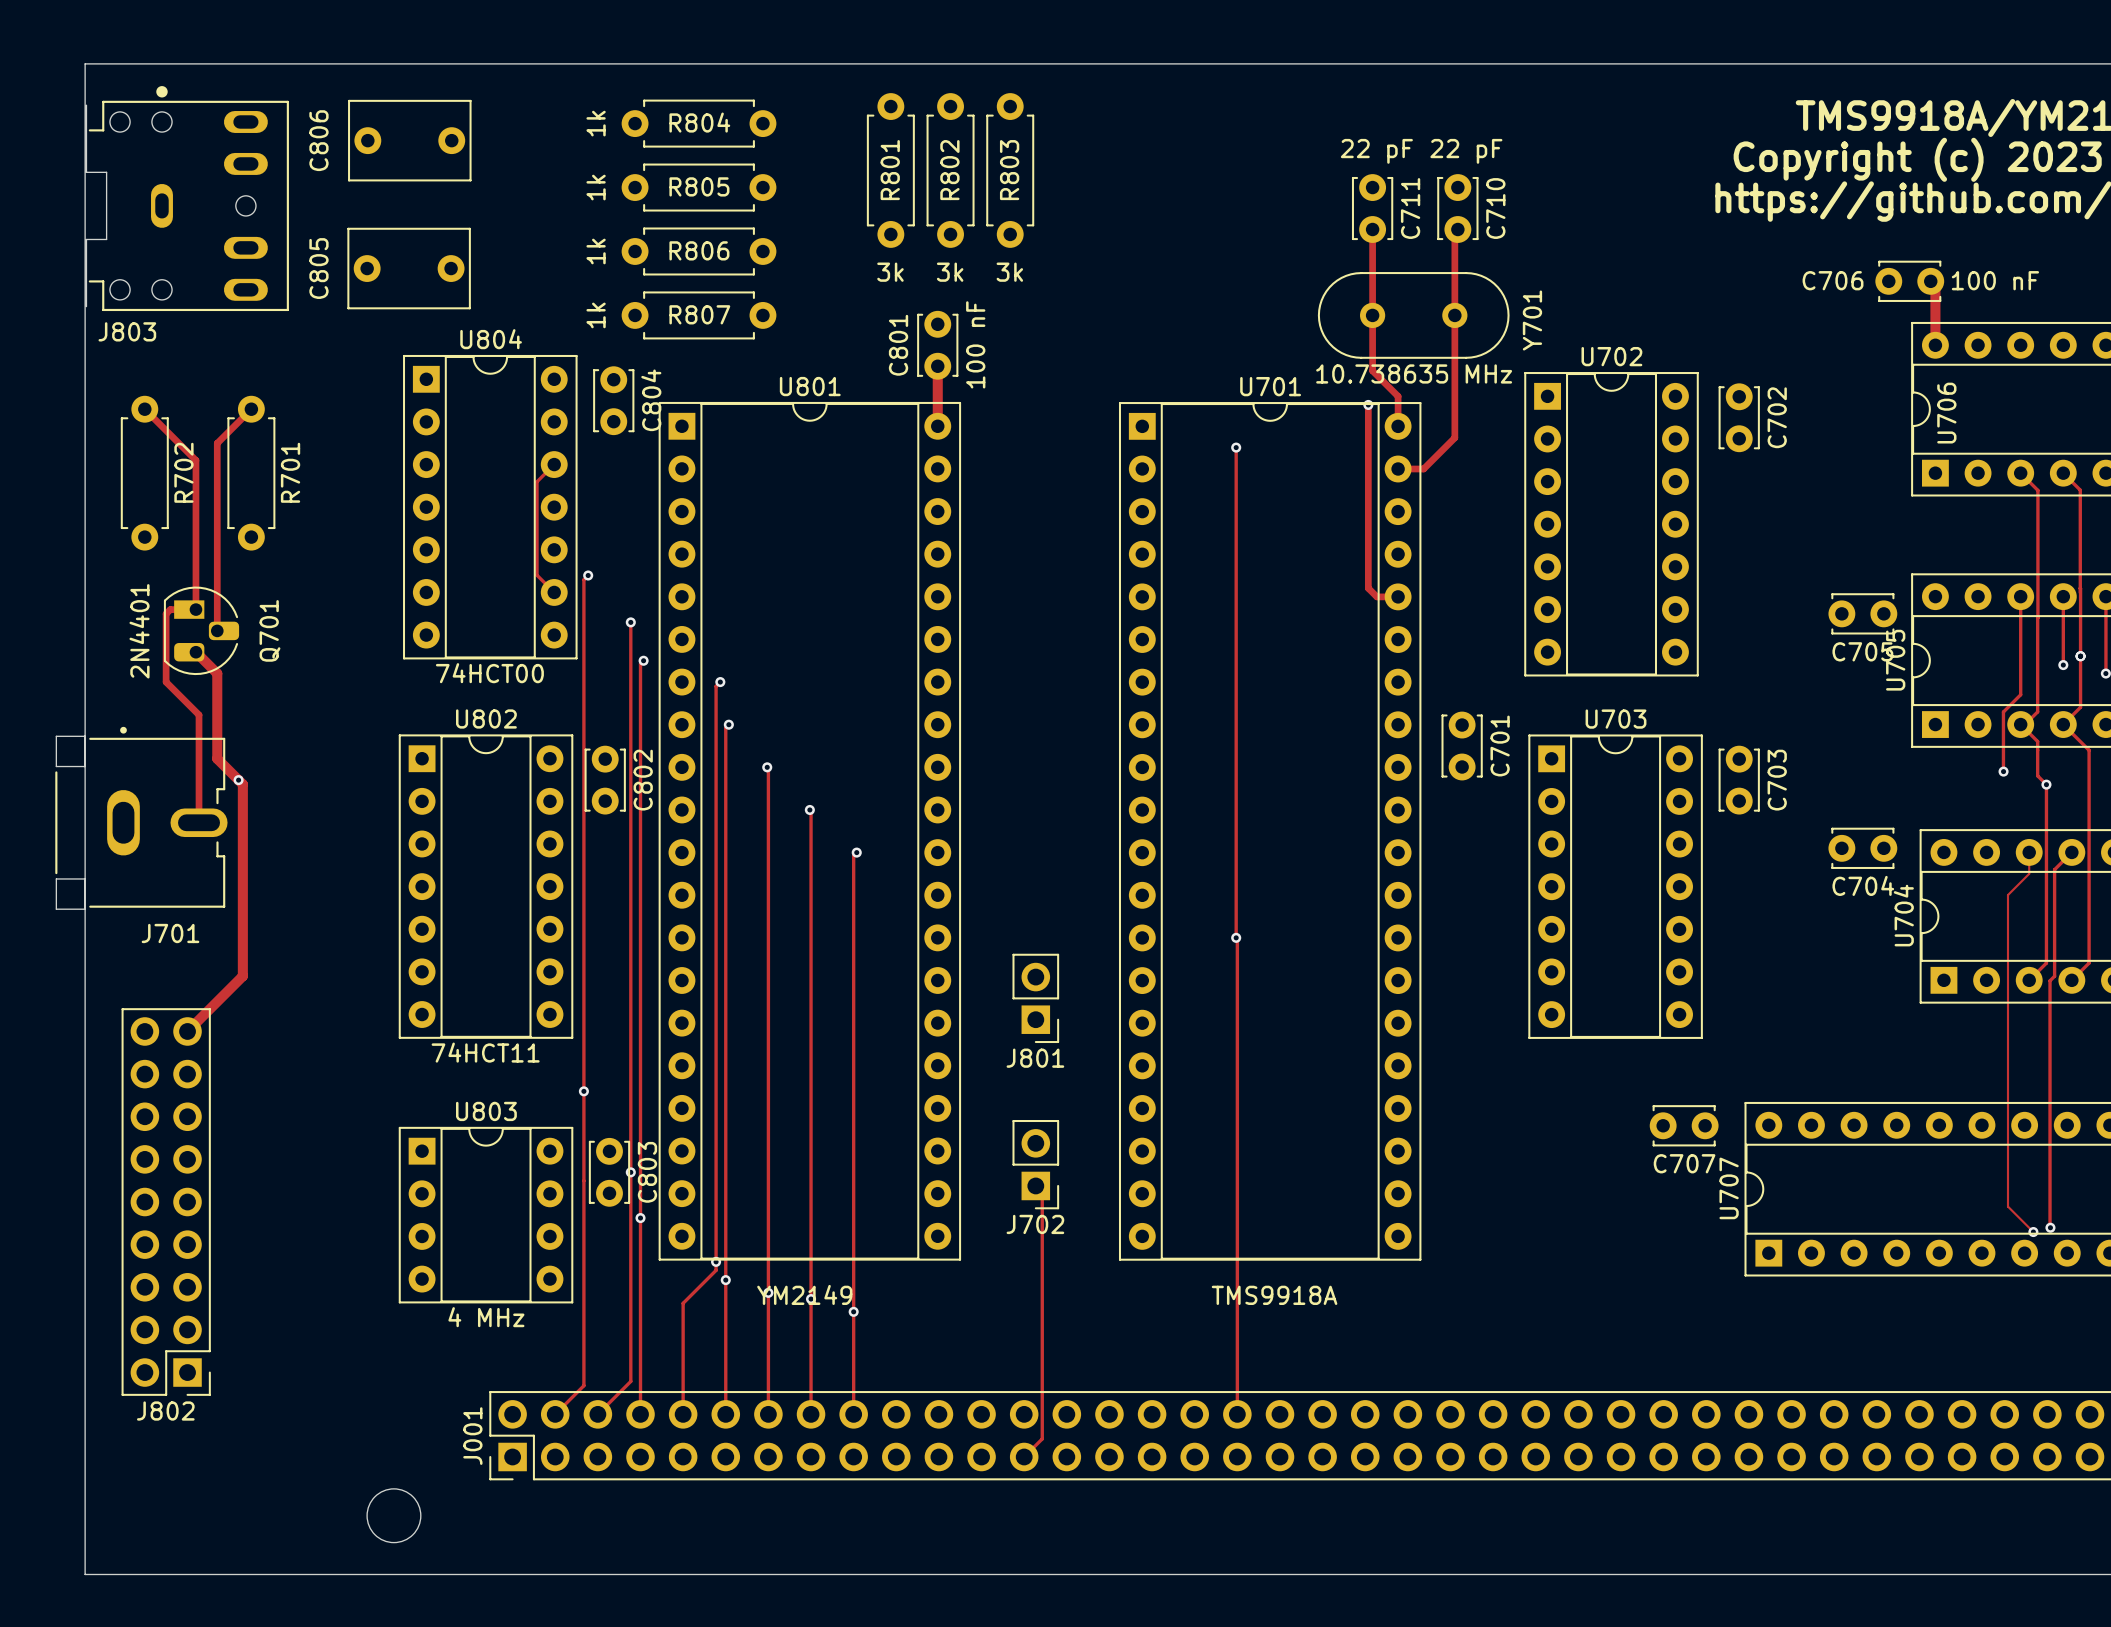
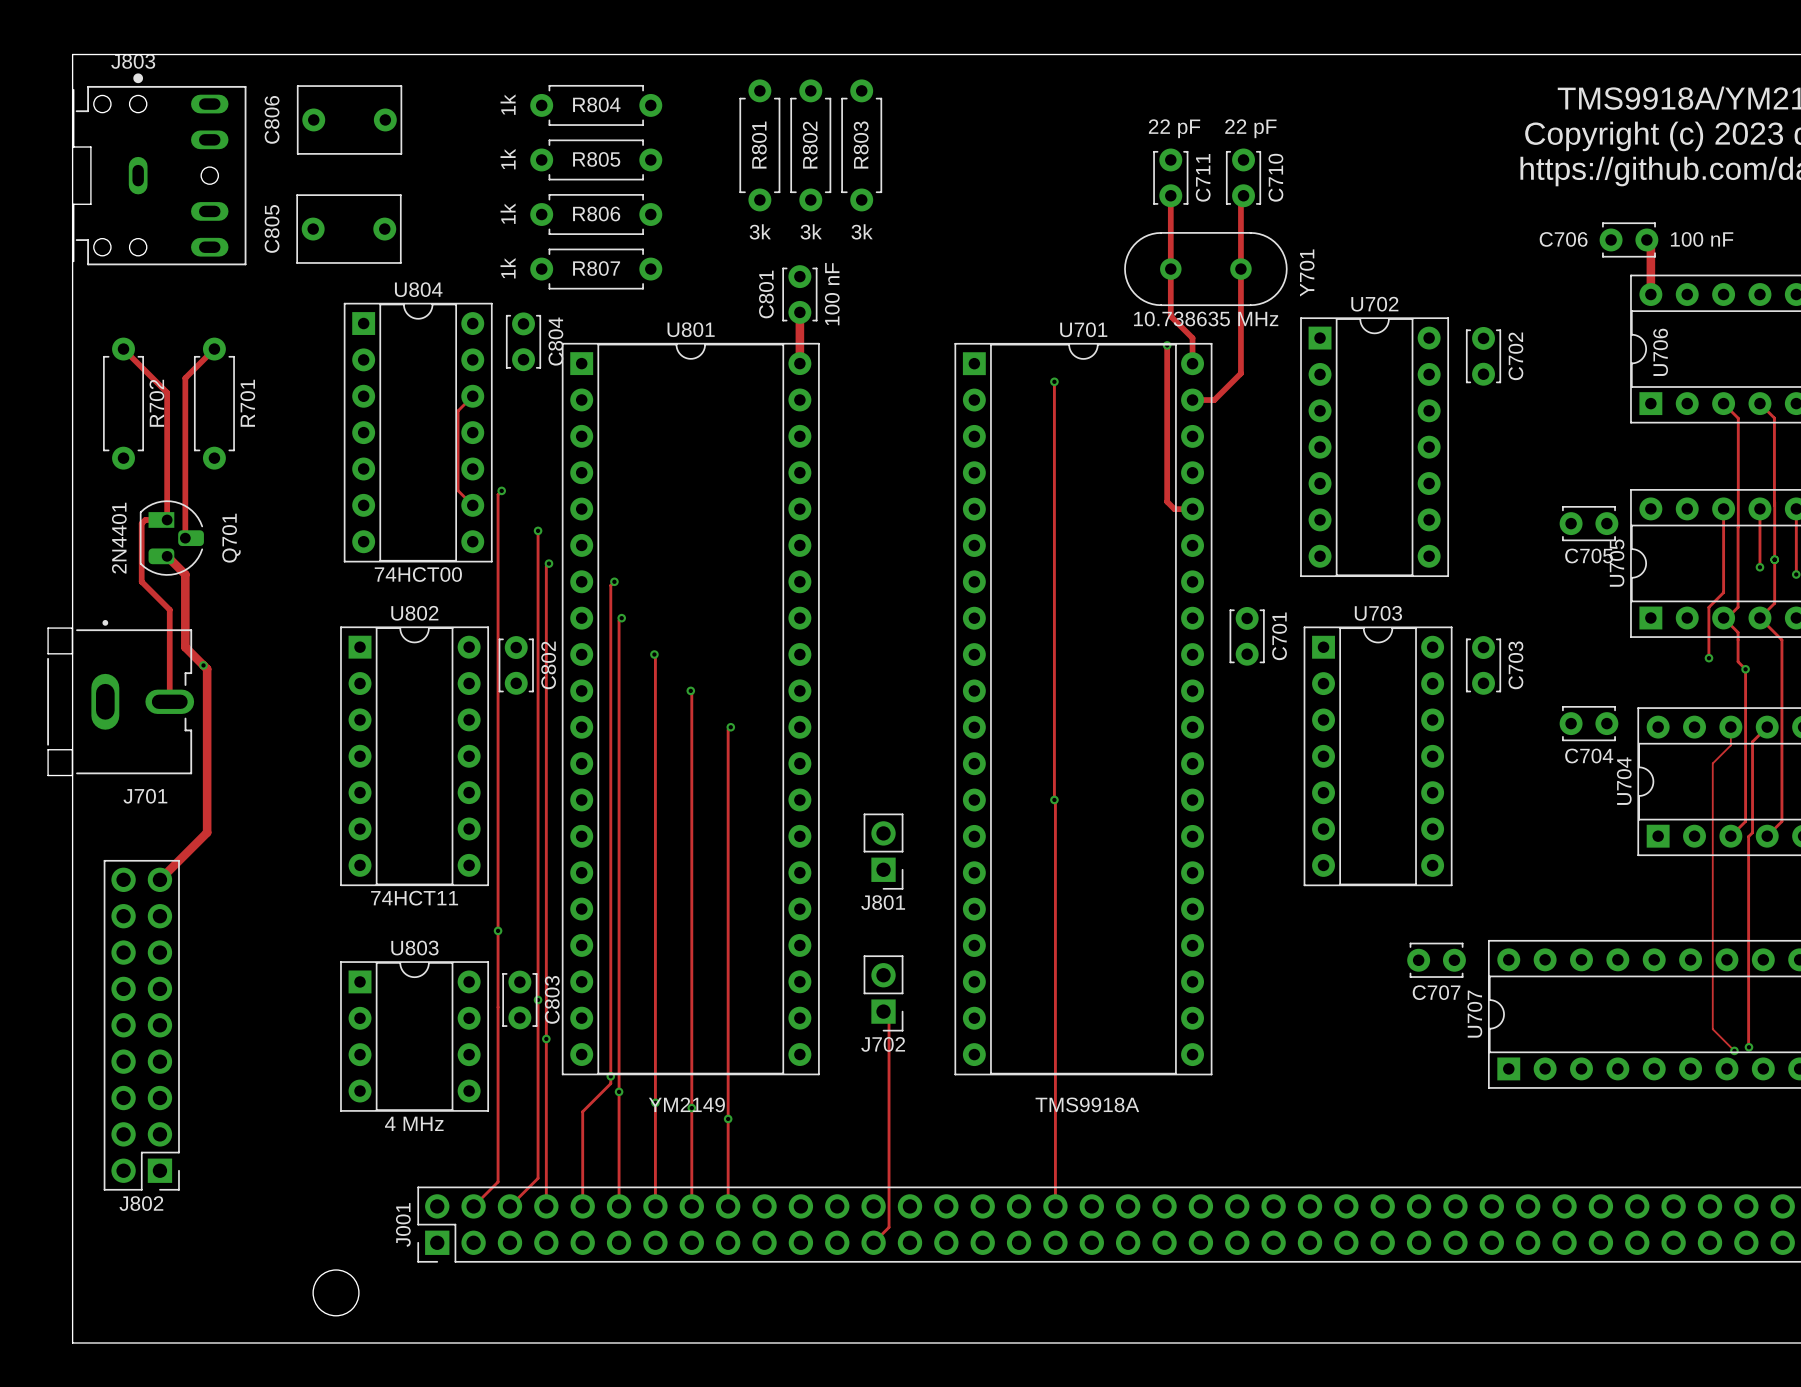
J803 name position: J803 (127, 331) -> J803 (133, 61)

